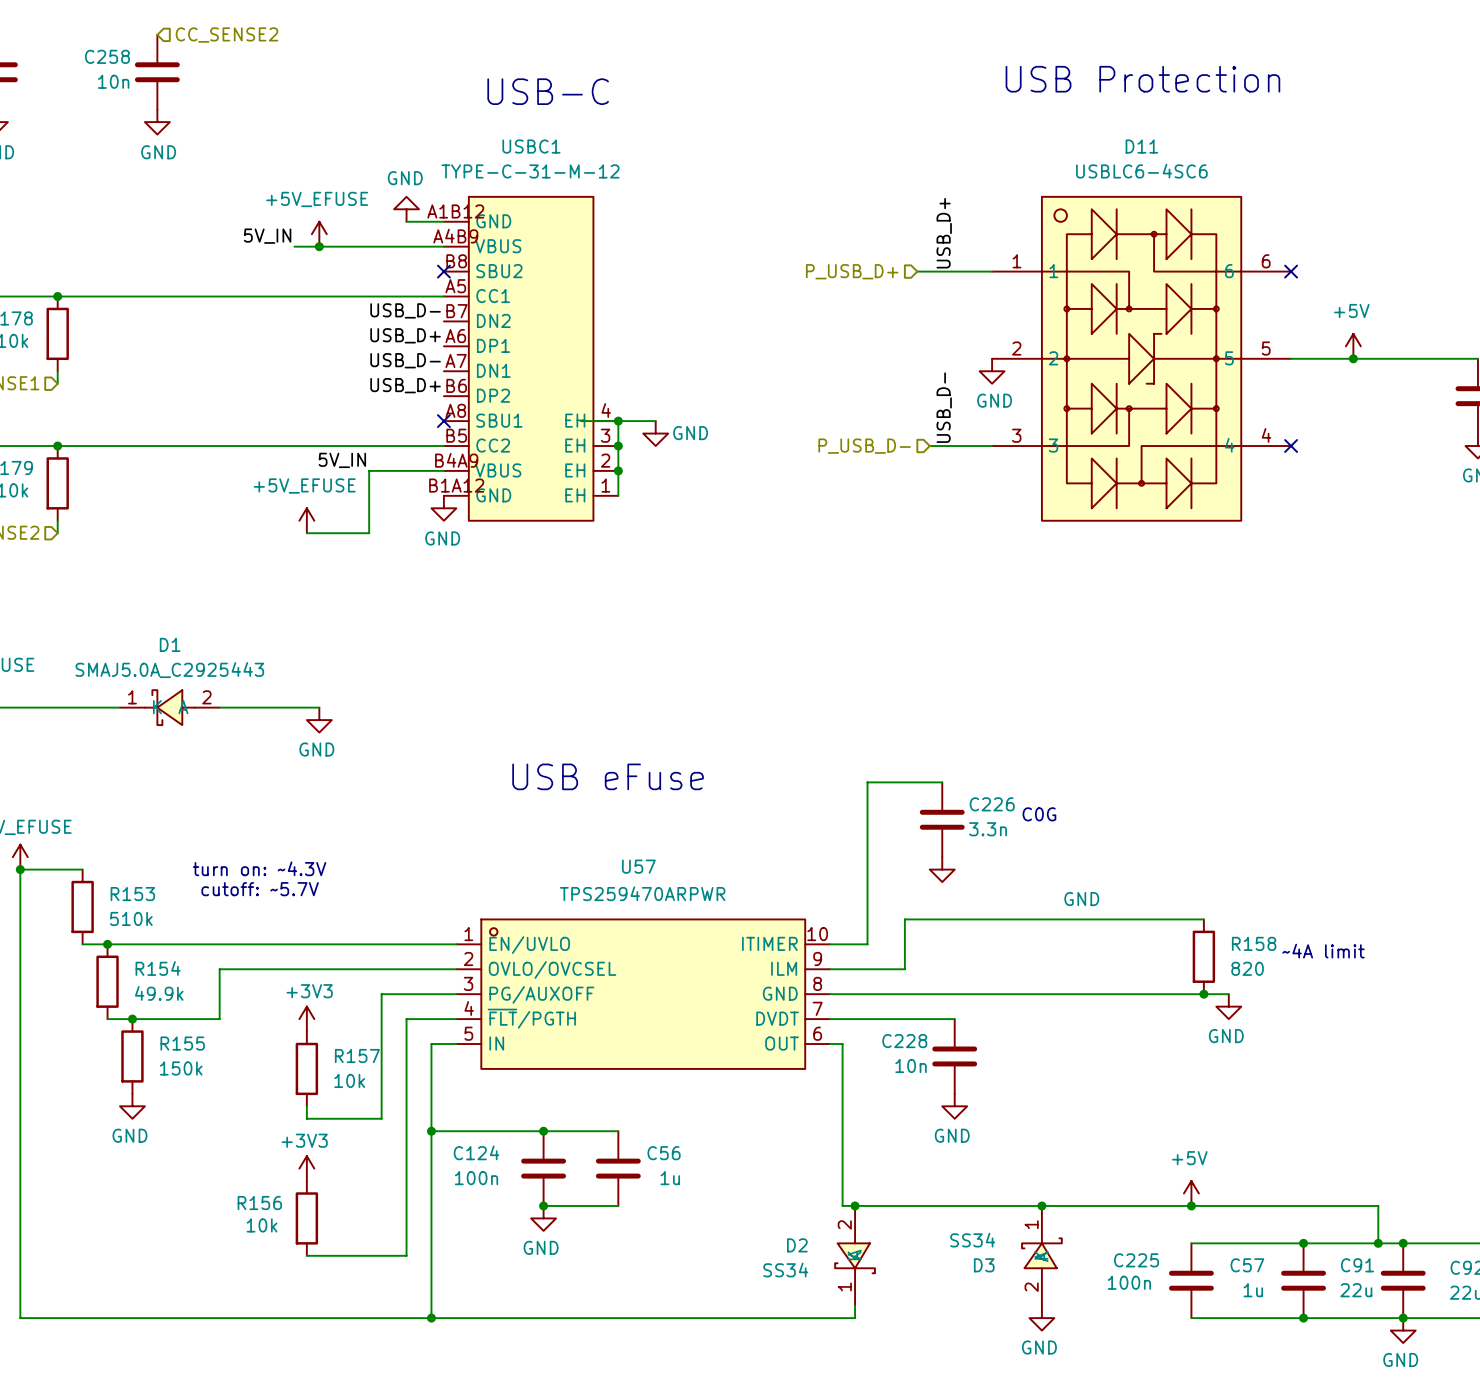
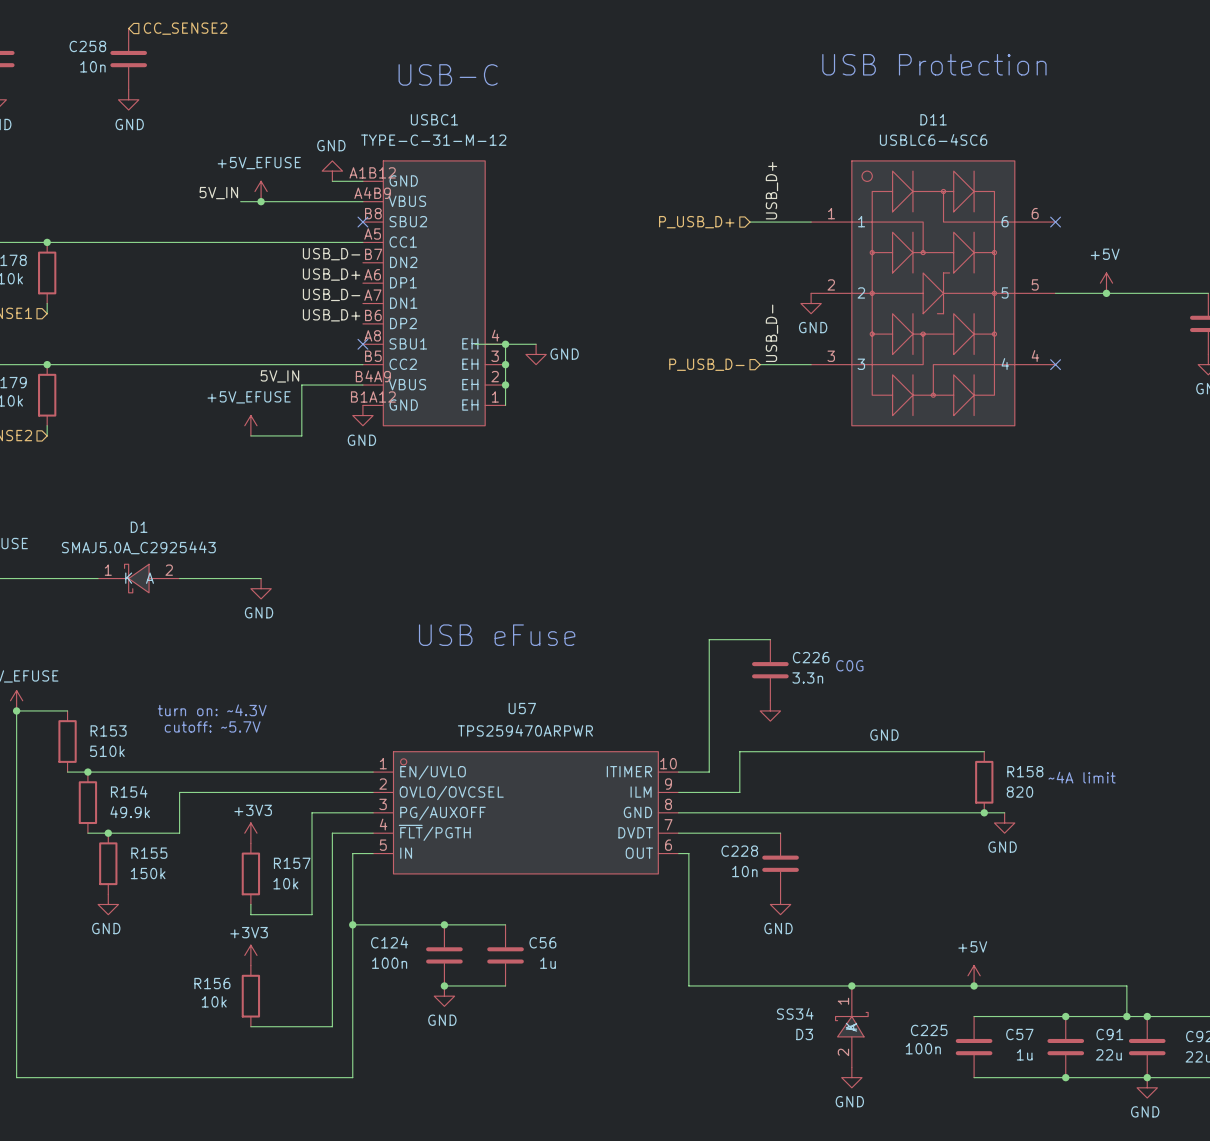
junction: (855, 1205) -> none
D2: SS34 (855, 1255) -> none
wire: (855, 1305) (855, 1318) (431, 1318) -> none
junction: (431, 1318) -> none

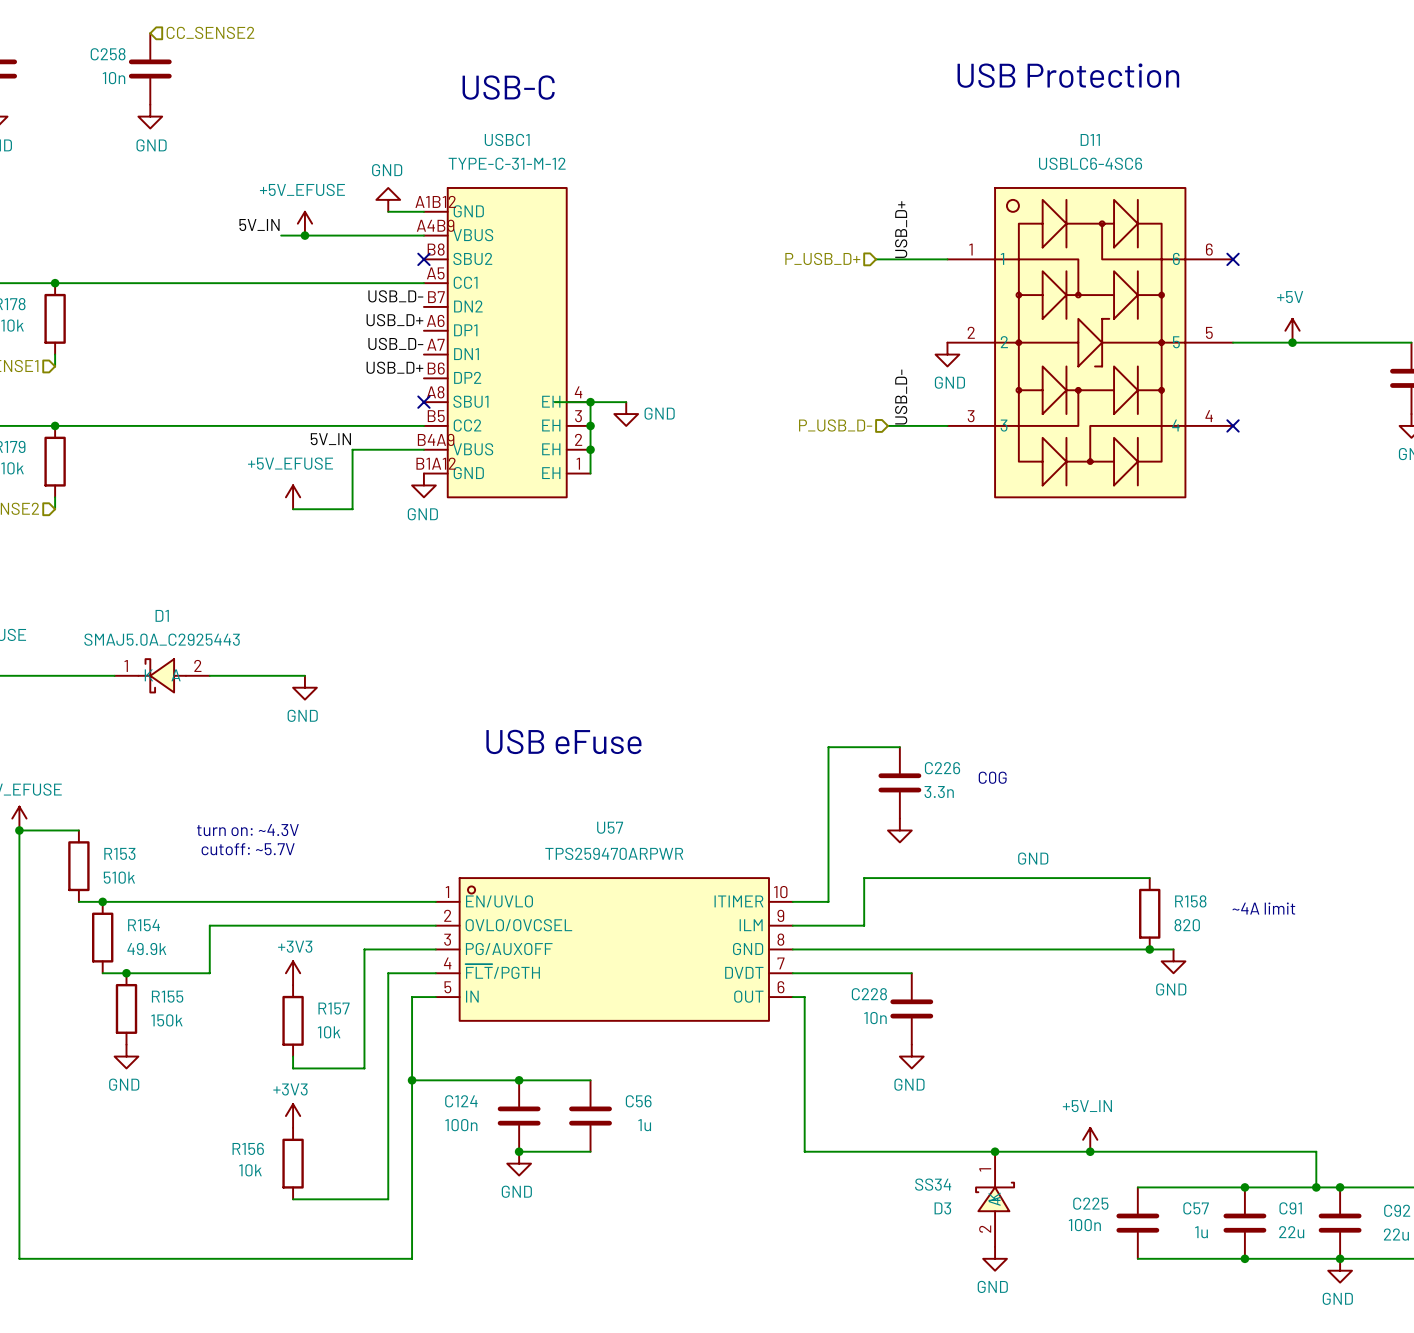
power symbol: none -> +5V_IN (1090, 1139)
power symbol: +5V (974, 975) -> none
junction position: (974, 985) -> (1090, 1151)

